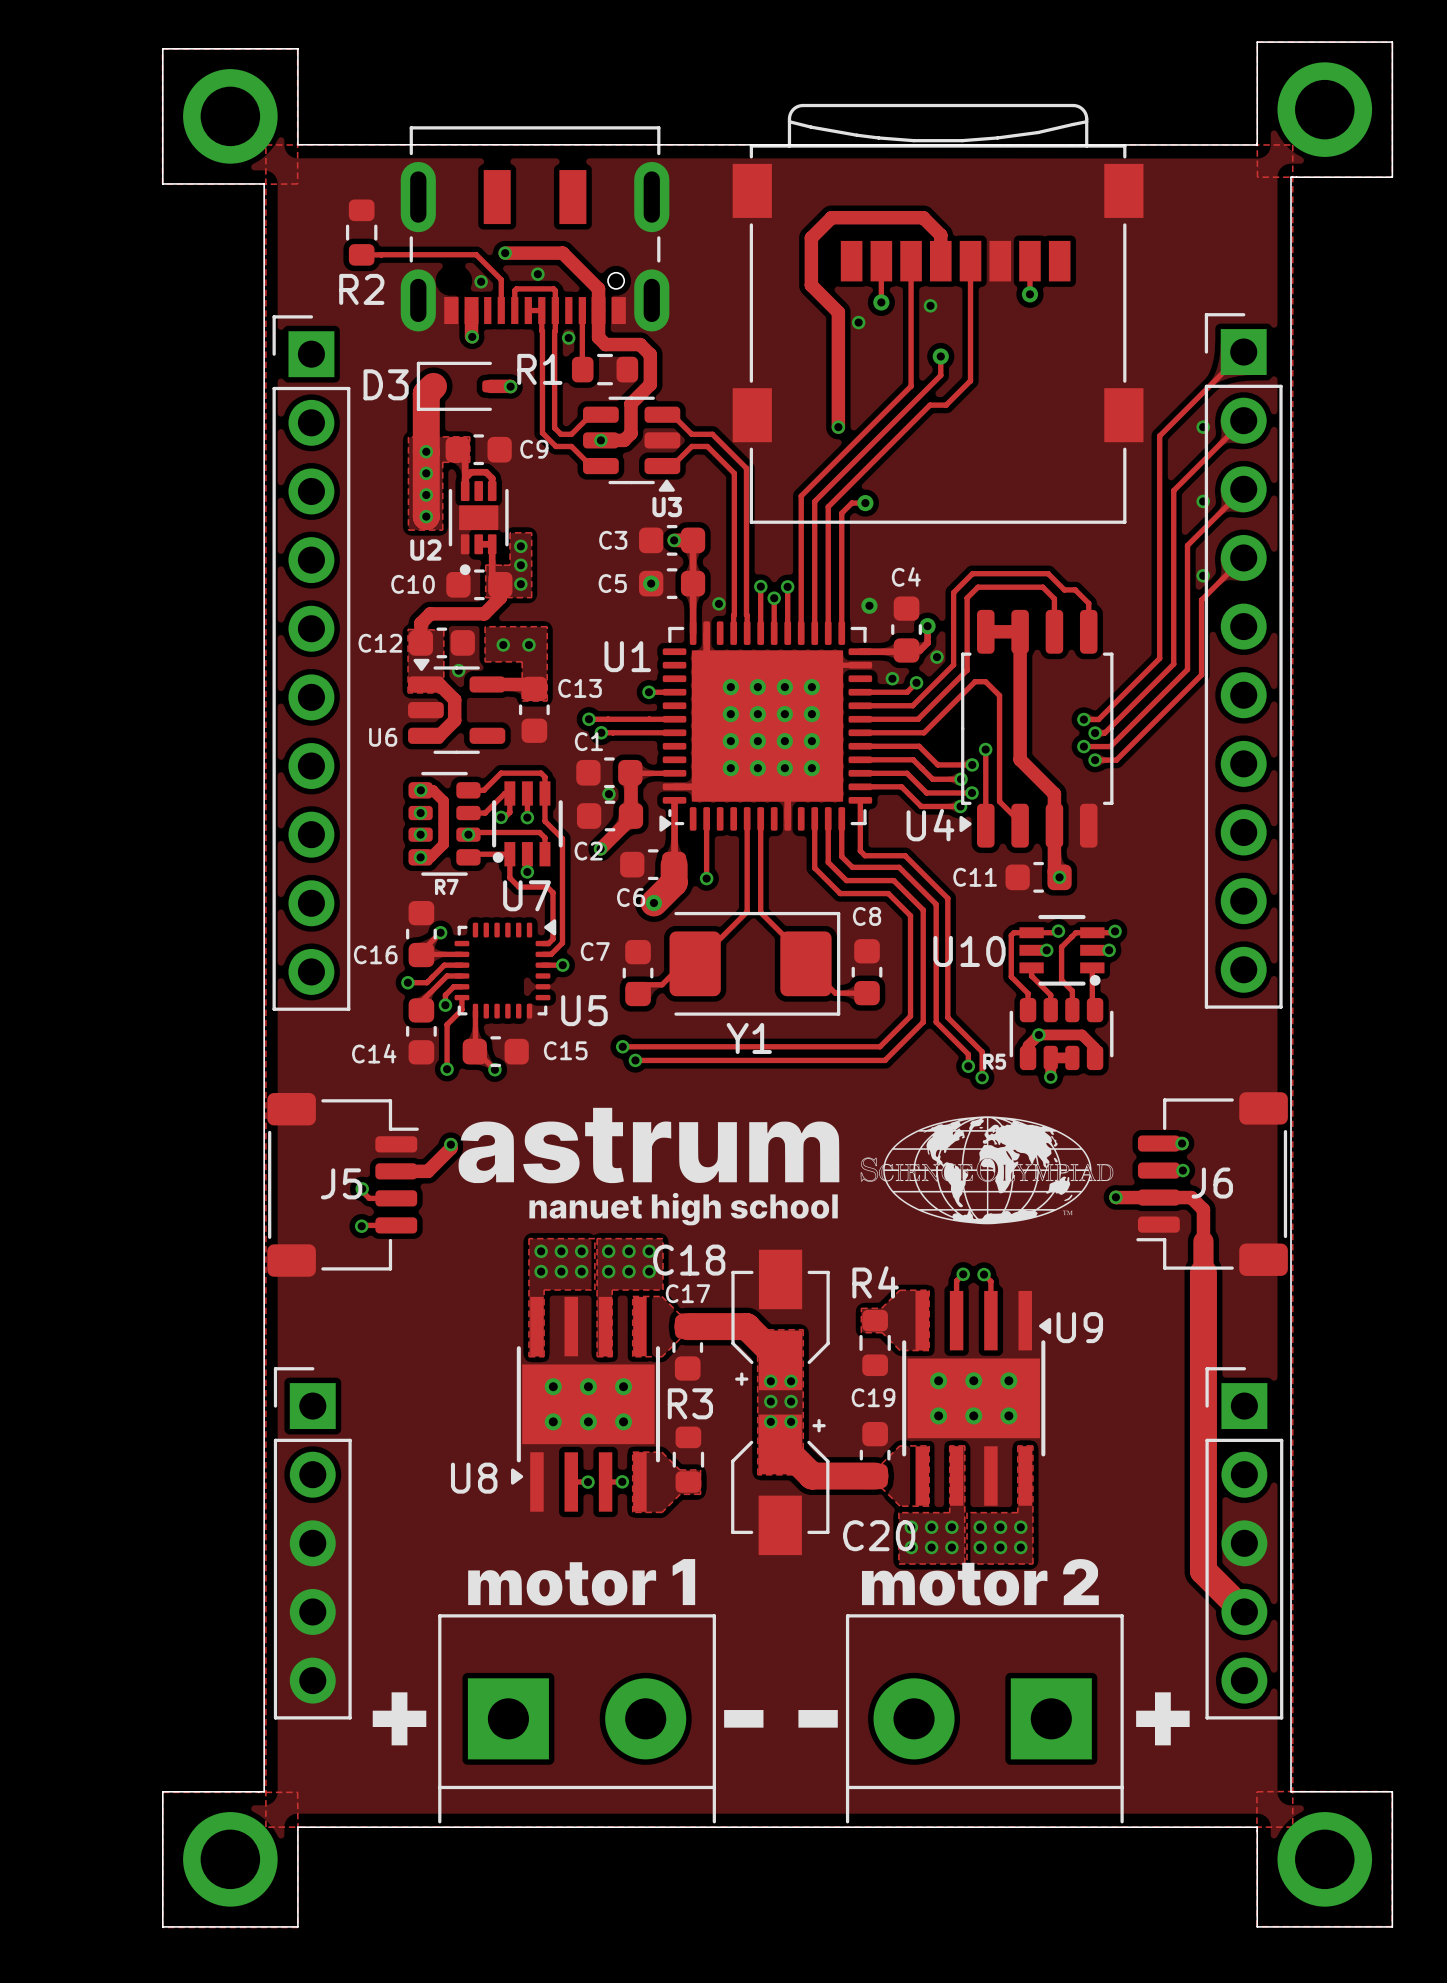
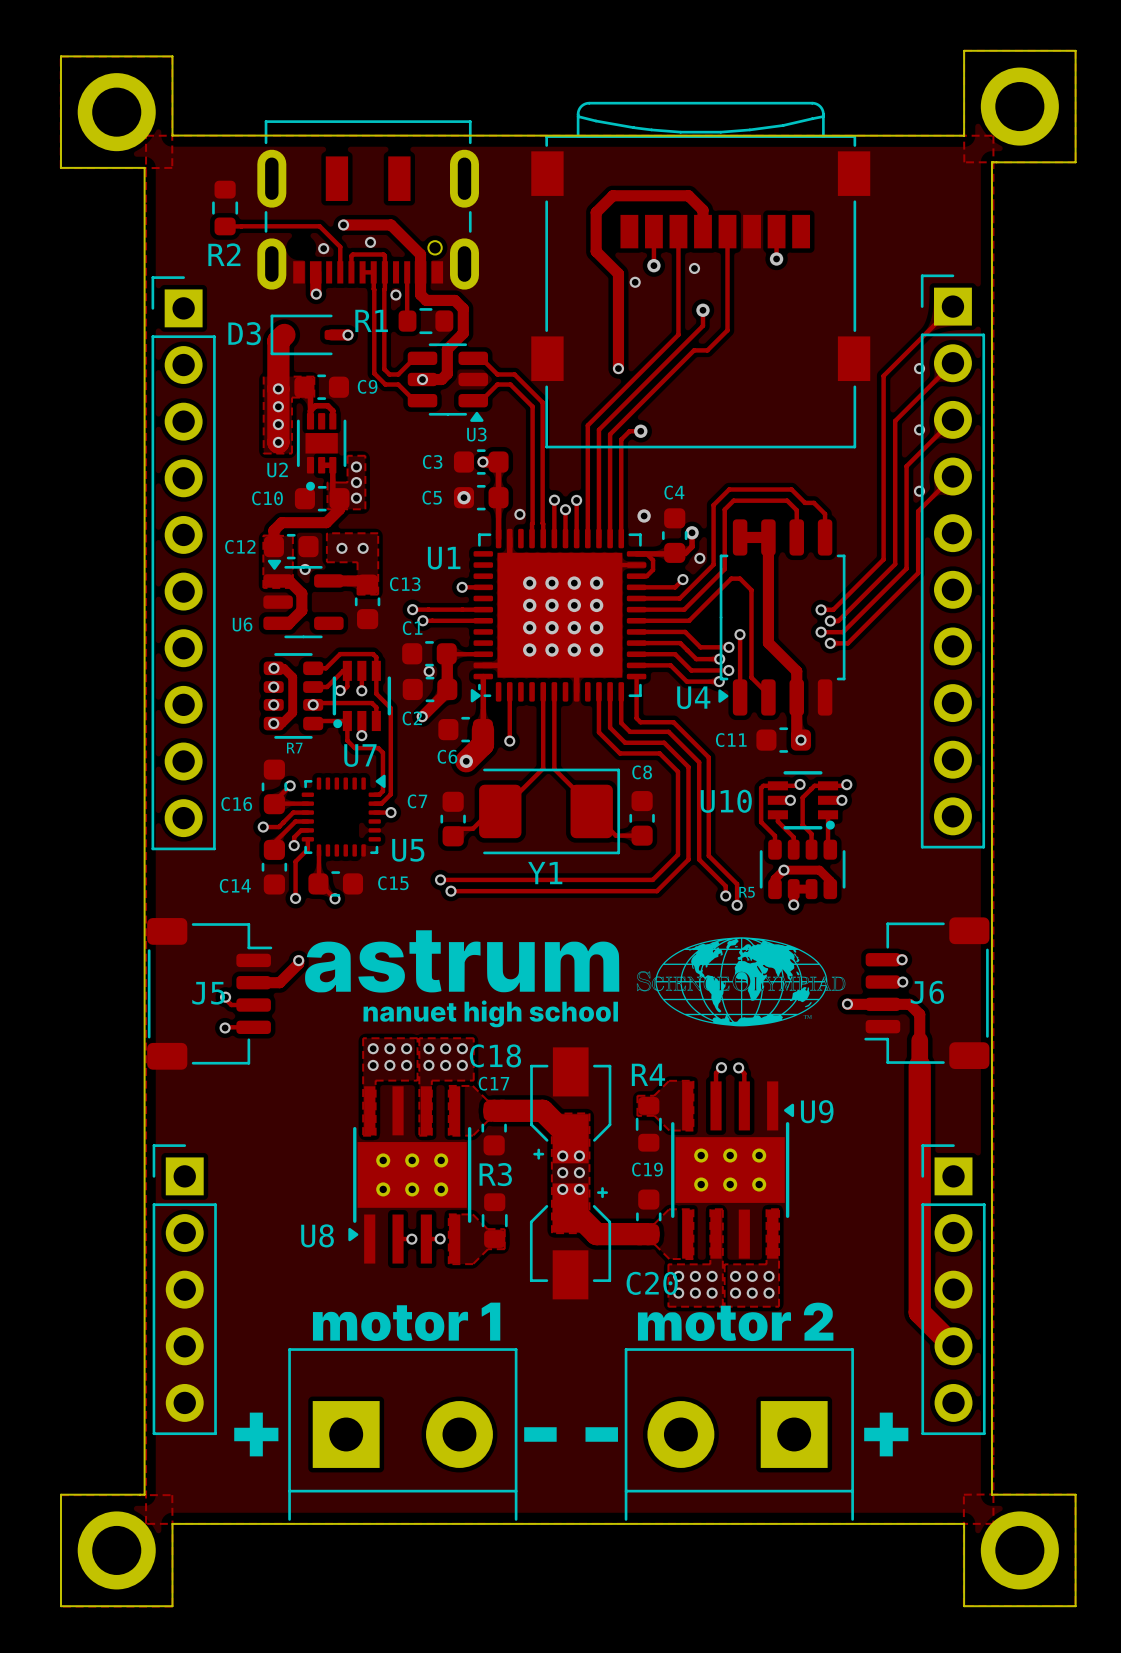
track: none -> (636, 553) (646, 553) (653, 560) (653, 569) (646, 576) (636, 576)
via: (892, 678) -> none

